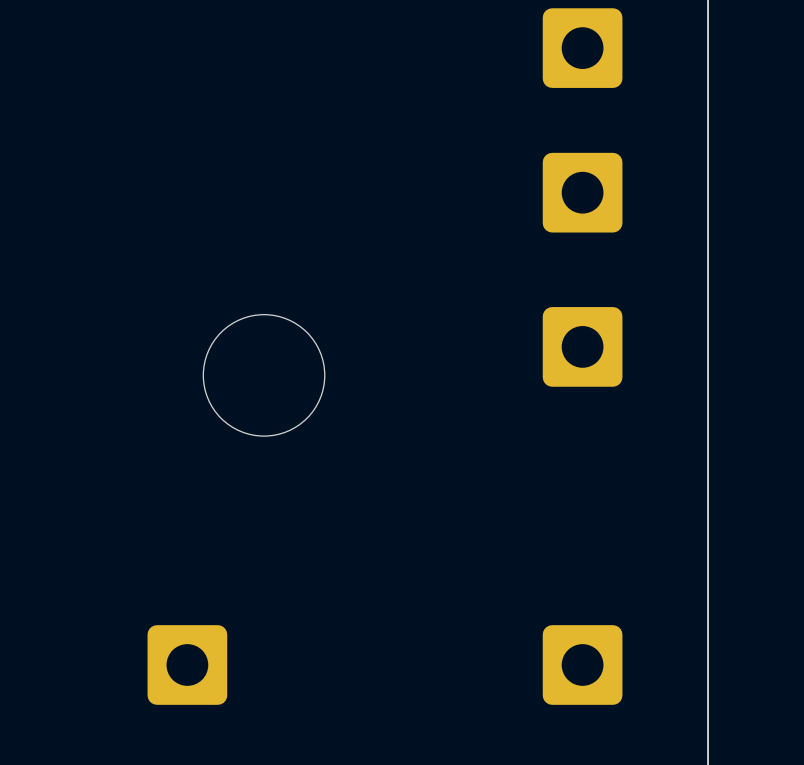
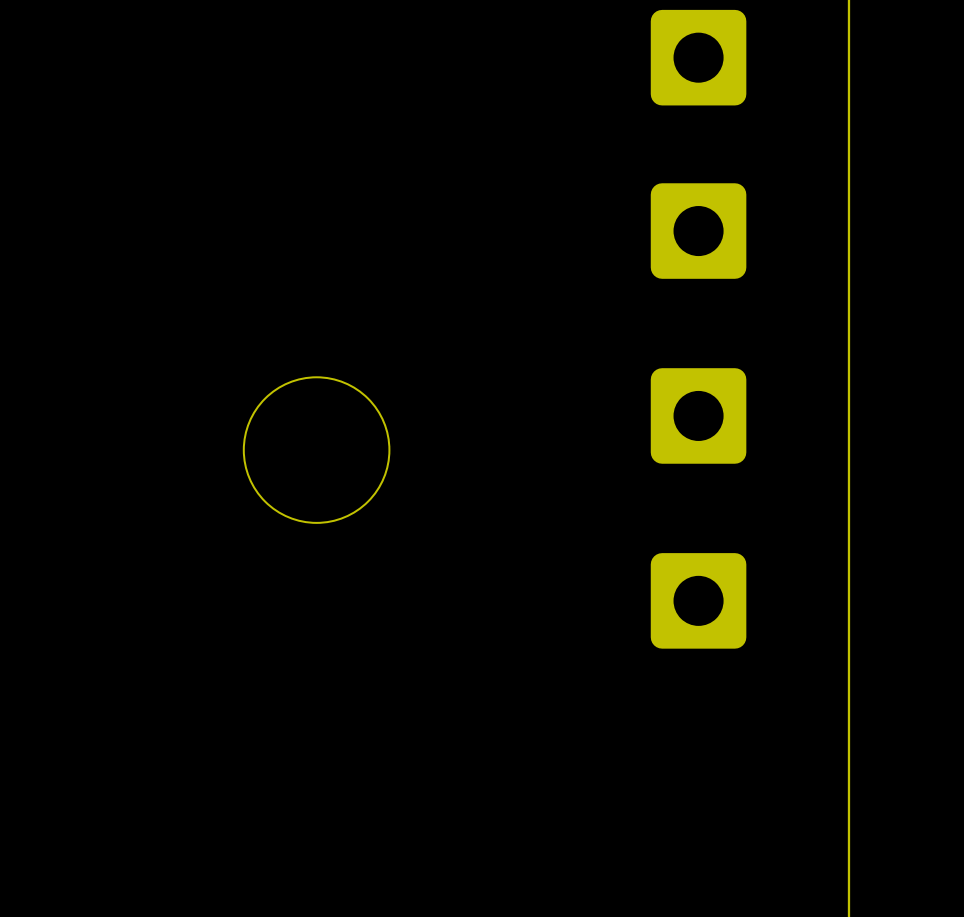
part: (187, 664) -> none
part position: (582, 664) -> (698, 600)

